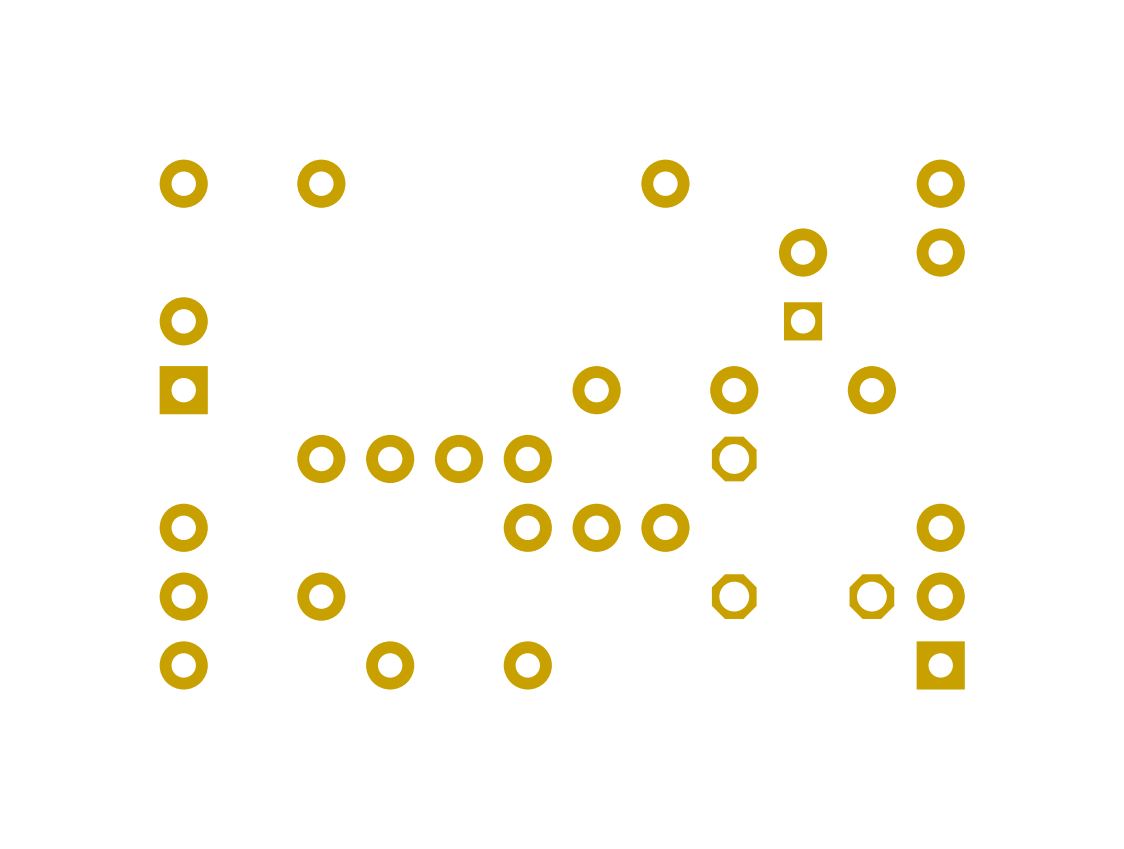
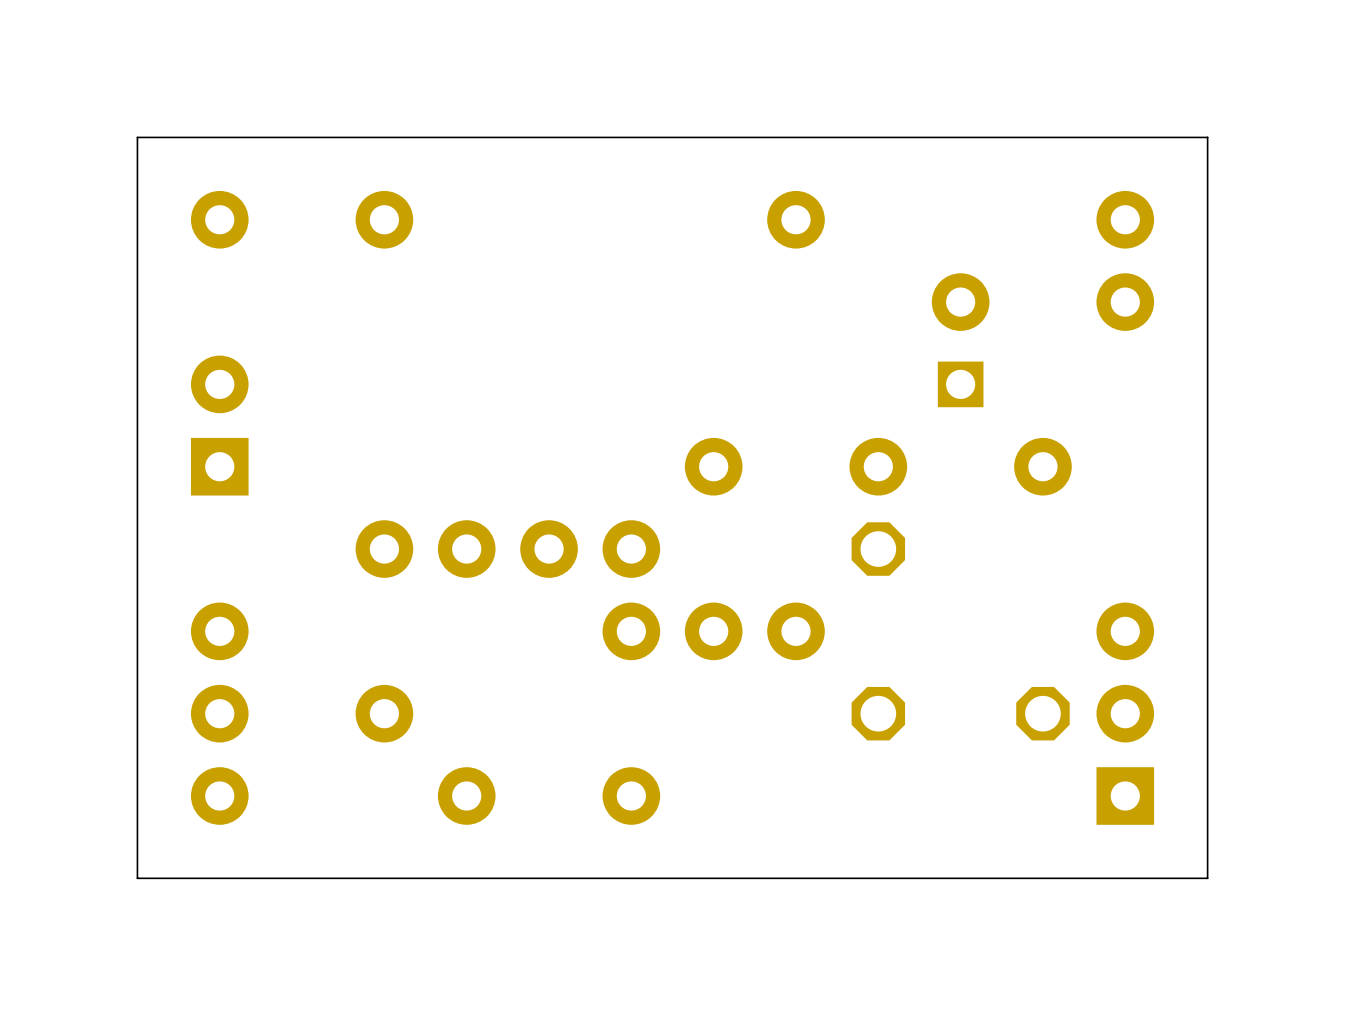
board edge: none -> (1207, 137) (137, 137) (137, 878) (1207, 878) (1207, 137)

